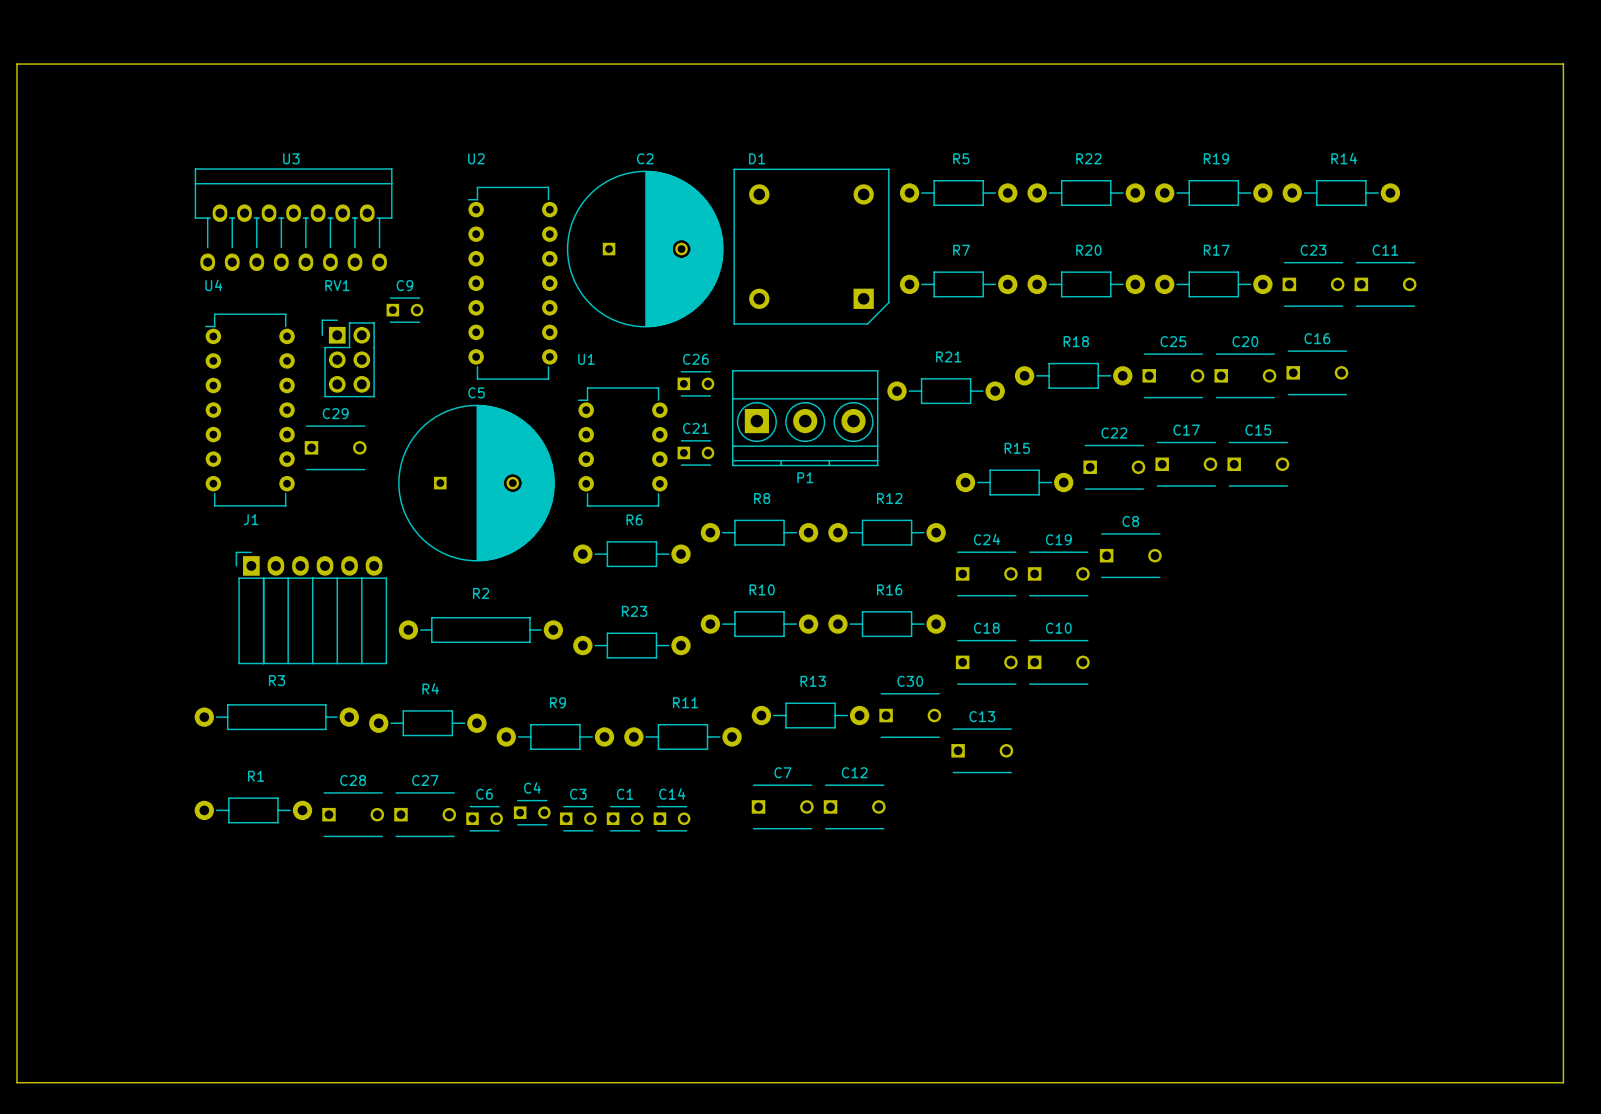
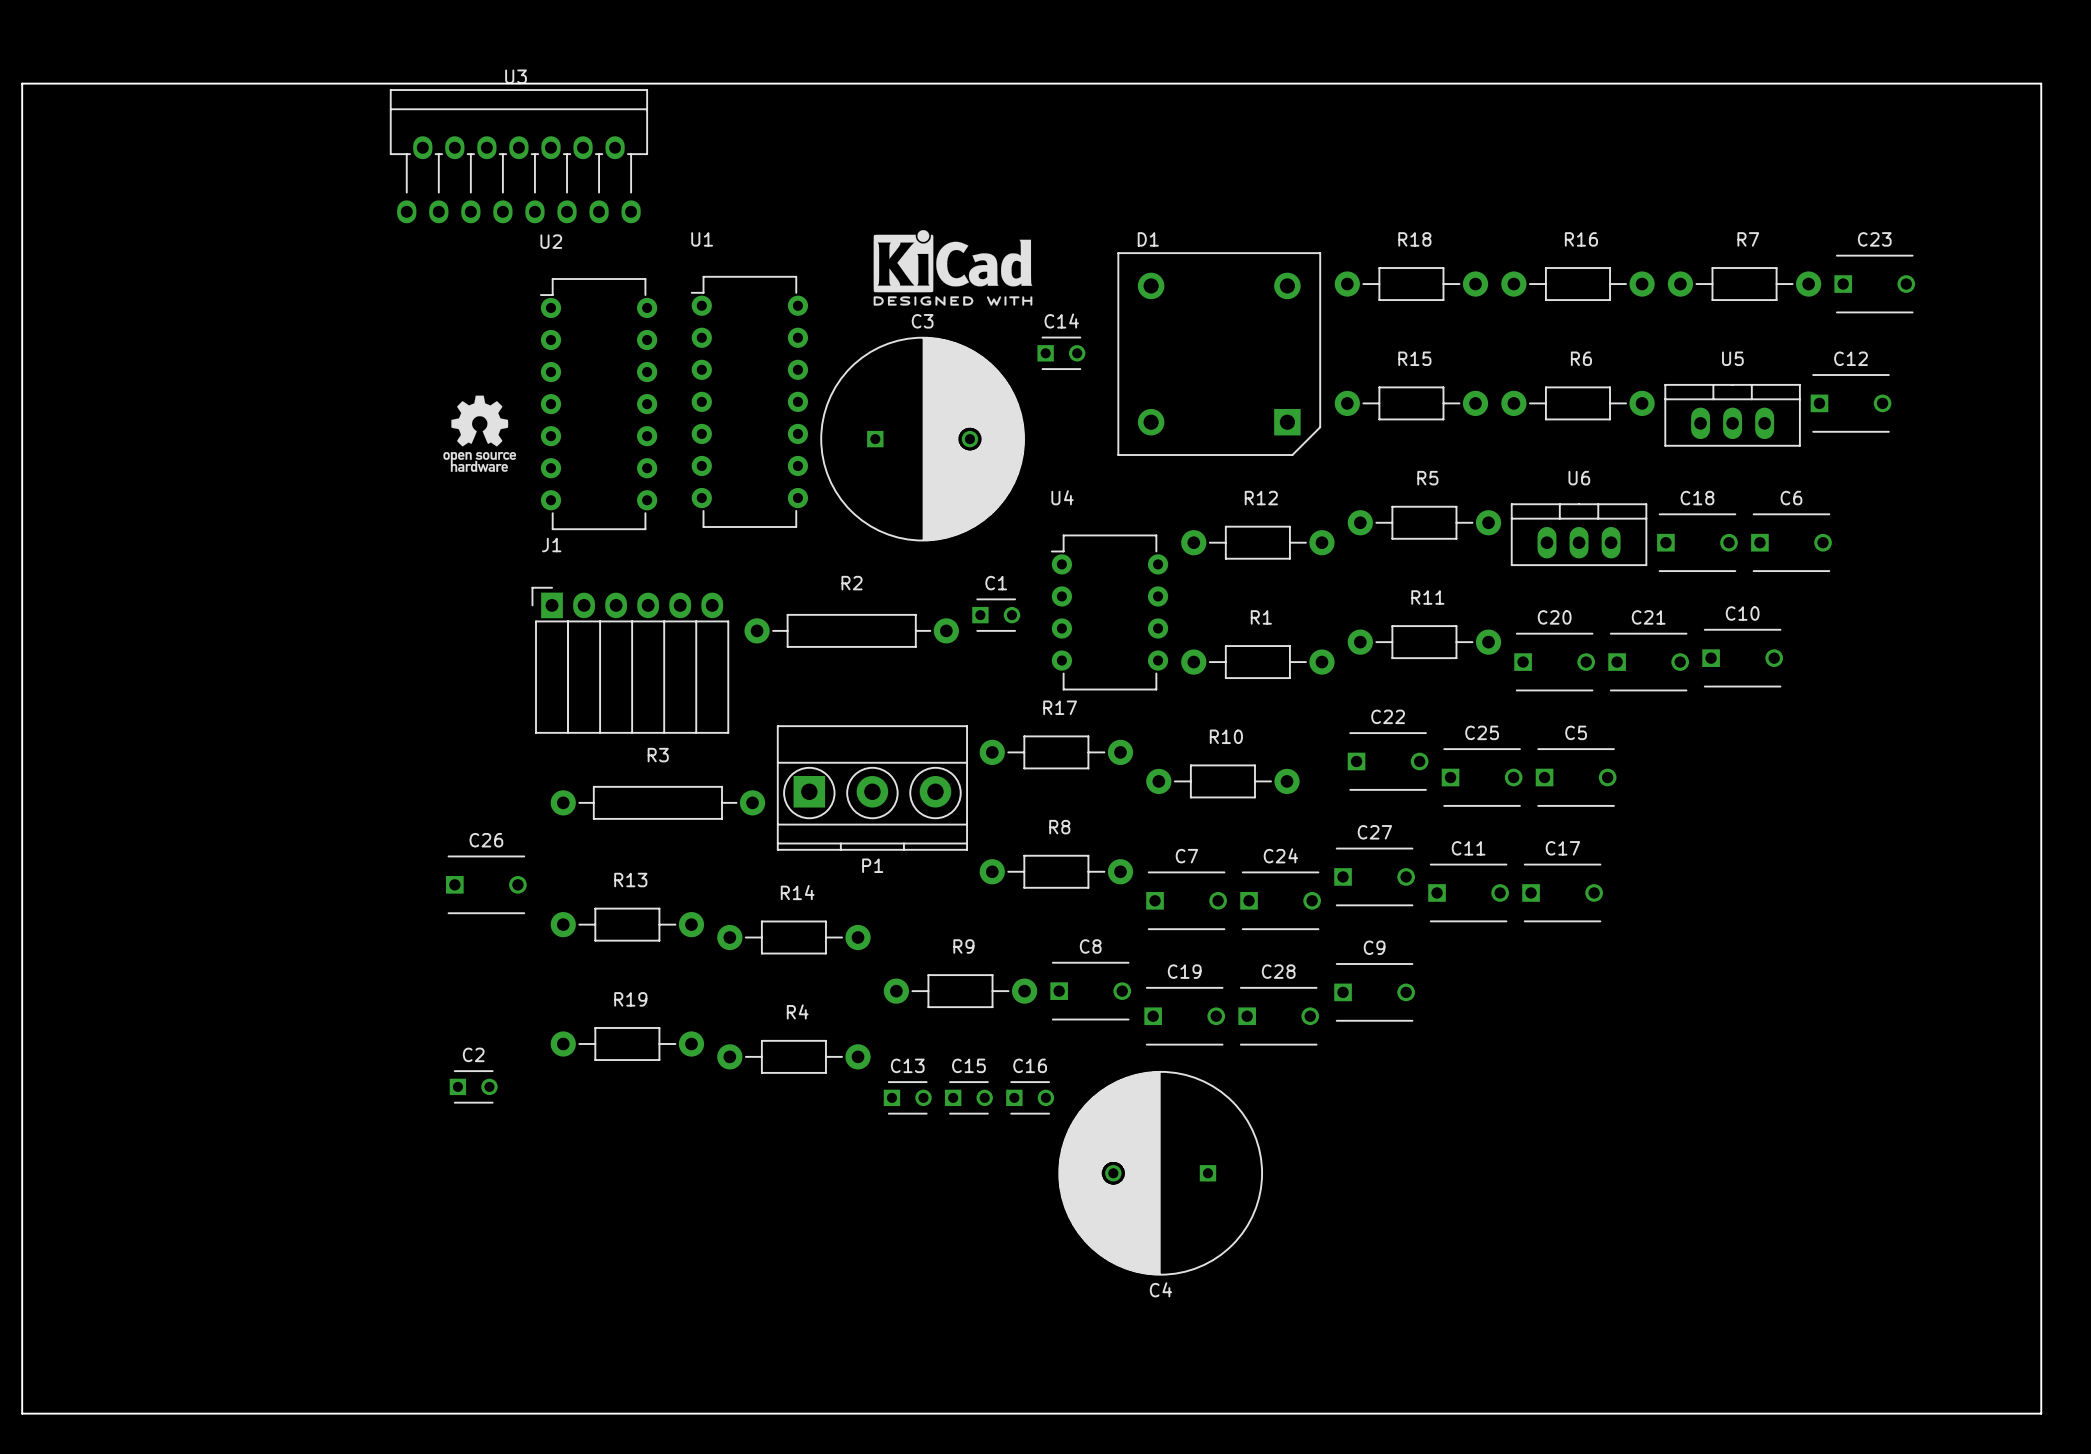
C2 name position: C2 (645, 158) -> C2 (473, 1054)
C2 footprint: [566, 170, 724, 328] -> [449, 1070, 498, 1104]
drawing: none -> [873, 230, 1033, 306]
R5 position: (958, 193) -> (1424, 522)
R22: (1086, 193) -> none
R19 position: (1213, 193) -> (627, 1044)
R14 position: (1341, 193) -> (793, 937)
U3 position: (293, 219) -> (518, 156)
D1 position: (811, 246) -> (1219, 354)
U2 position: (512, 283) -> (598, 404)
R7 position: (958, 284) -> (1744, 284)
R20: (1086, 284) -> none
R17 position: (1213, 284) -> (1056, 752)
C23 position: (1313, 284) -> (1874, 284)
C11 position: (1385, 284) -> (1468, 892)
U4 name position: U4 (213, 285) -> U4 (1062, 497)
C9 footprint: [386, 297, 424, 323] -> [1334, 963, 1415, 1022]
drawing: none -> [443, 395, 517, 472]
U4 footprint: [204, 313, 295, 507] -> [1050, 534, 1169, 691]
U5: none -> (1732, 415)
C16 footprint: [1286, 350, 1349, 396] -> [1006, 1081, 1055, 1115]
RV1: (348, 358) -> none
U1 name position: U1 (586, 359) -> U1 (702, 239)
C26 footprint: [677, 371, 715, 397] -> [446, 855, 527, 915]
R18 position: (1073, 375) -> (1411, 284)
C25 position: (1173, 375) -> (1482, 777)
C20 position: (1245, 375) -> (1554, 662)
U1 footprint: [577, 387, 668, 507] -> [690, 275, 809, 528]
R21: (946, 391) -> none
C5 name position: C5 (476, 392) -> C5 (1576, 732)
C5 footprint: [398, 404, 555, 562] -> [1535, 748, 1617, 807]
U6: none -> (1579, 534)
P1 position: (805, 418) -> (872, 787)
C21 footprint: [677, 440, 715, 466] -> [1608, 632, 1690, 692]
C15 footprint: [1227, 441, 1290, 487] -> [944, 1081, 993, 1115]
C29: (335, 447) -> none
C17 position: (1186, 464) -> (1562, 892)
C22 position: (1114, 467) -> (1388, 761)
R15 position: (1014, 482) -> (1411, 403)
R8 position: (759, 532) -> (1056, 871)
R12 position: (887, 532) -> (1257, 542)
R6 position: (631, 554) -> (1577, 403)
C8 position: (1130, 555) -> (1090, 991)
C24 position: (986, 573) -> (1280, 900)
C19 position: (1058, 573) -> (1184, 1016)
J1 position: (311, 607) -> (630, 660)
R10 position: (759, 624) -> (1222, 781)
R16 position: (887, 624) -> (1577, 284)
R2 position: (480, 629) -> (851, 630)
R23: (631, 645) -> none
C18 position: (986, 662) -> (1697, 542)
C10 position: (1058, 662) -> (1742, 658)
R13 position: (810, 715) -> (627, 924)
C30: (910, 715) -> none
R3 position: (276, 717) -> (657, 802)
R4 position: (427, 723) -> (793, 1056)
C13 footprint: [951, 728, 1014, 774] -> [883, 1081, 932, 1115]
R9 position: (555, 736) -> (960, 991)
R11 position: (682, 736) -> (1424, 642)
C4 name position: C4 (532, 787) -> C4 (1160, 1289)
C3 name position: C3 (578, 794) -> C3 (922, 321)
C4 footprint: [513, 799, 551, 826] -> [1058, 1070, 1264, 1276]
C6 footprint: [466, 805, 503, 832] -> [1751, 513, 1832, 573]
C3 footprint: [559, 805, 597, 832] -> [820, 336, 1025, 542]
C7 position: (782, 806) -> (1186, 900)
C12 position: (854, 806) -> (1851, 403)
R1 position: (253, 810) -> (1257, 662)
C28 position: (353, 814) -> (1278, 1016)
C27 position: (425, 814) -> (1374, 876)
C1 position: (625, 818) -> (996, 615)
C14 position: (672, 818) -> (1061, 353)

